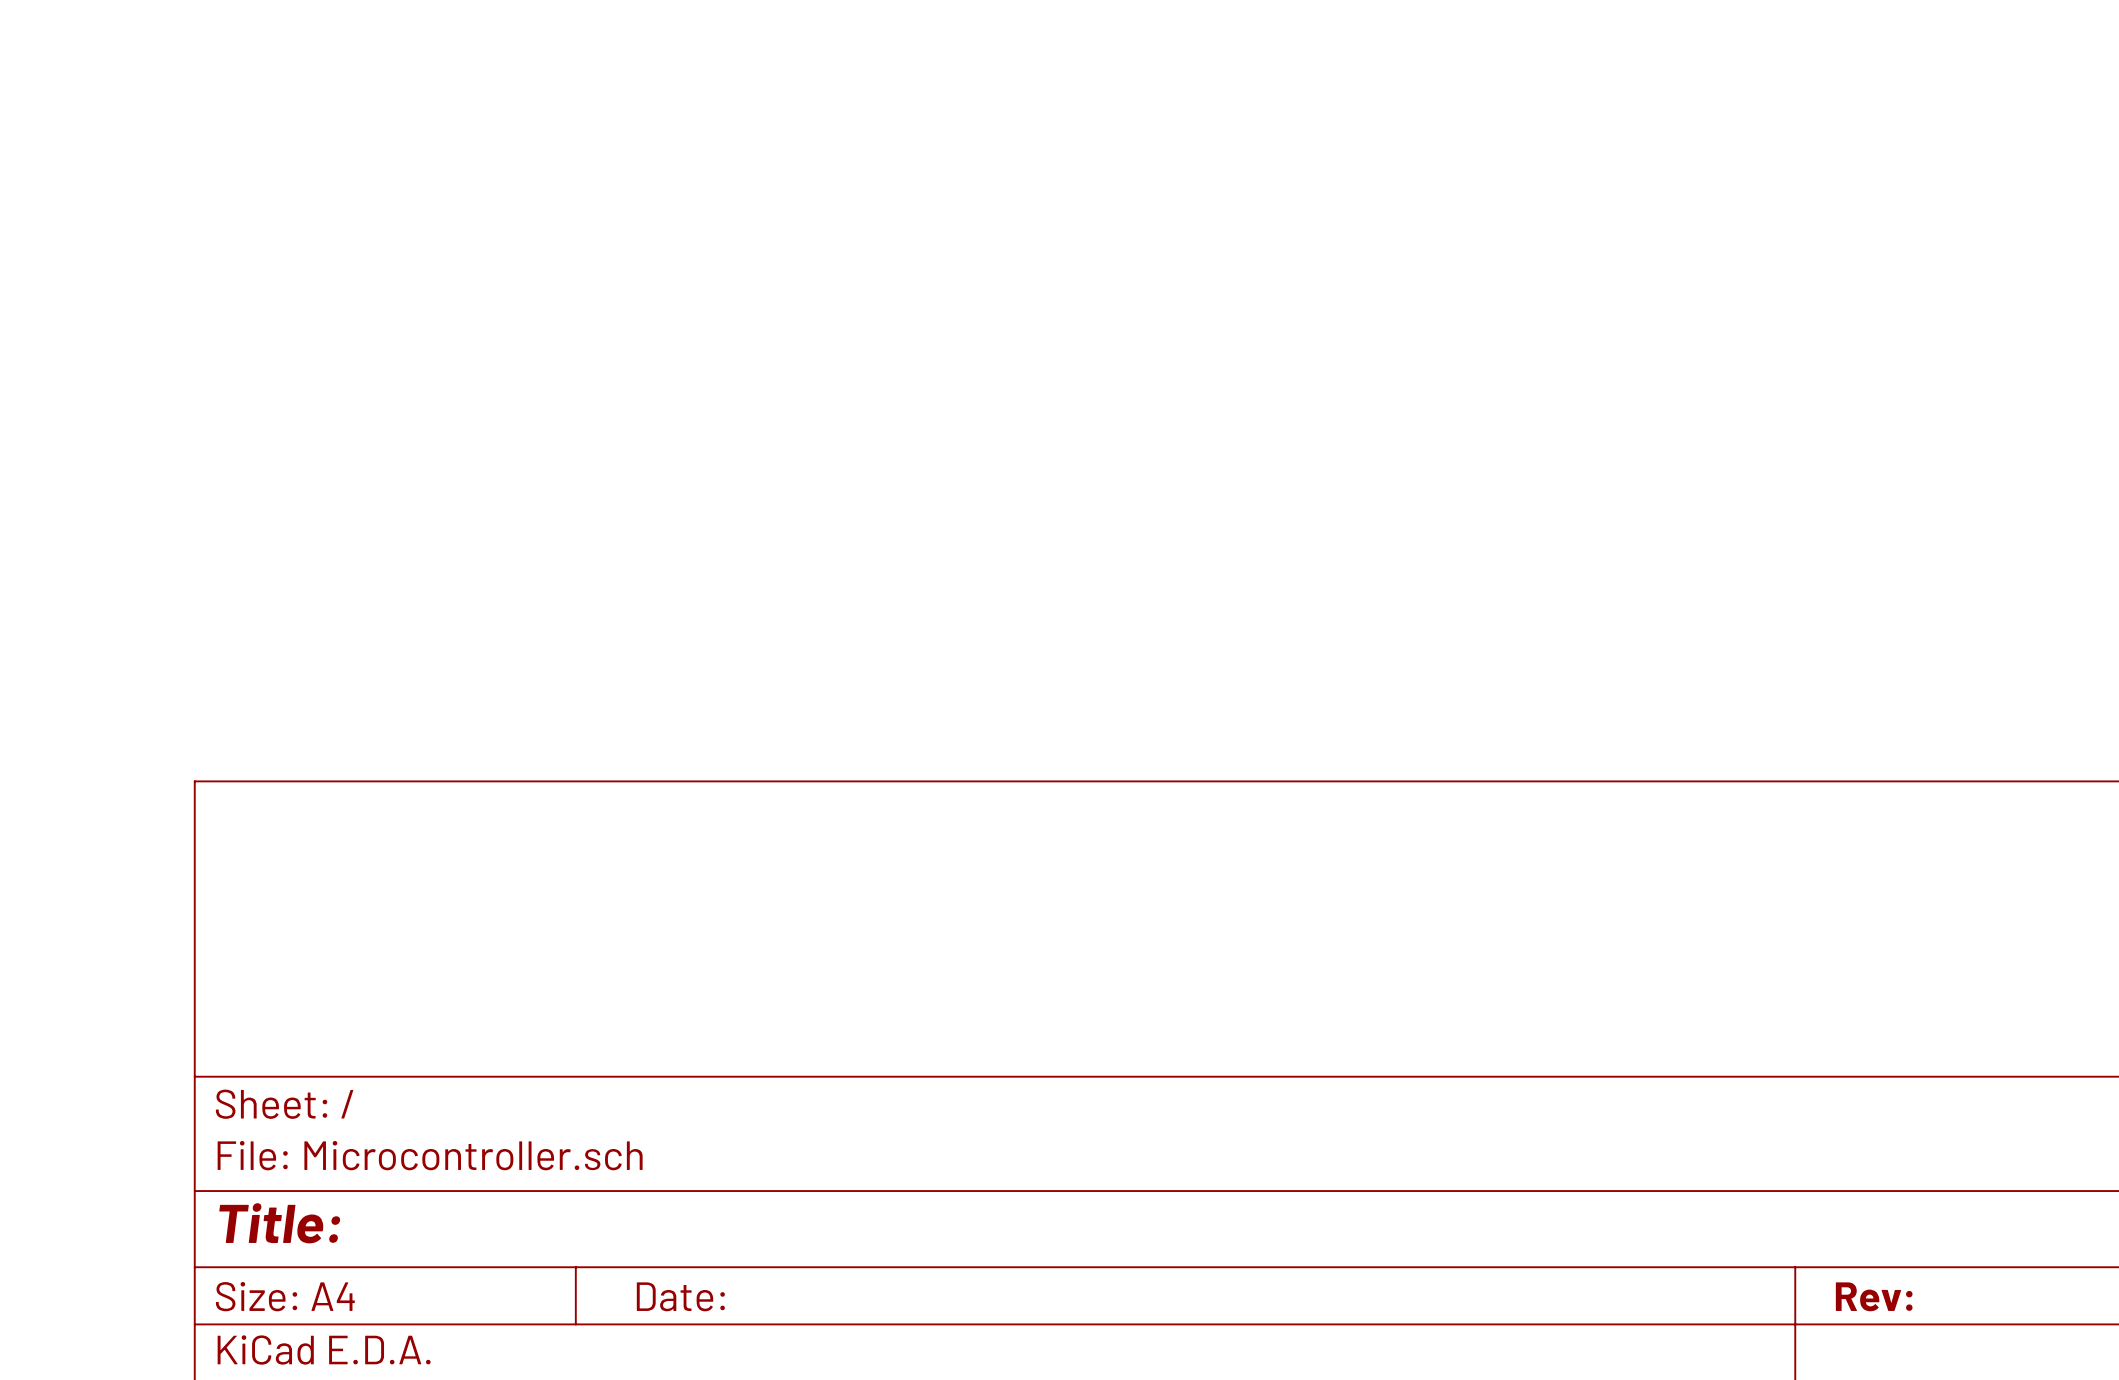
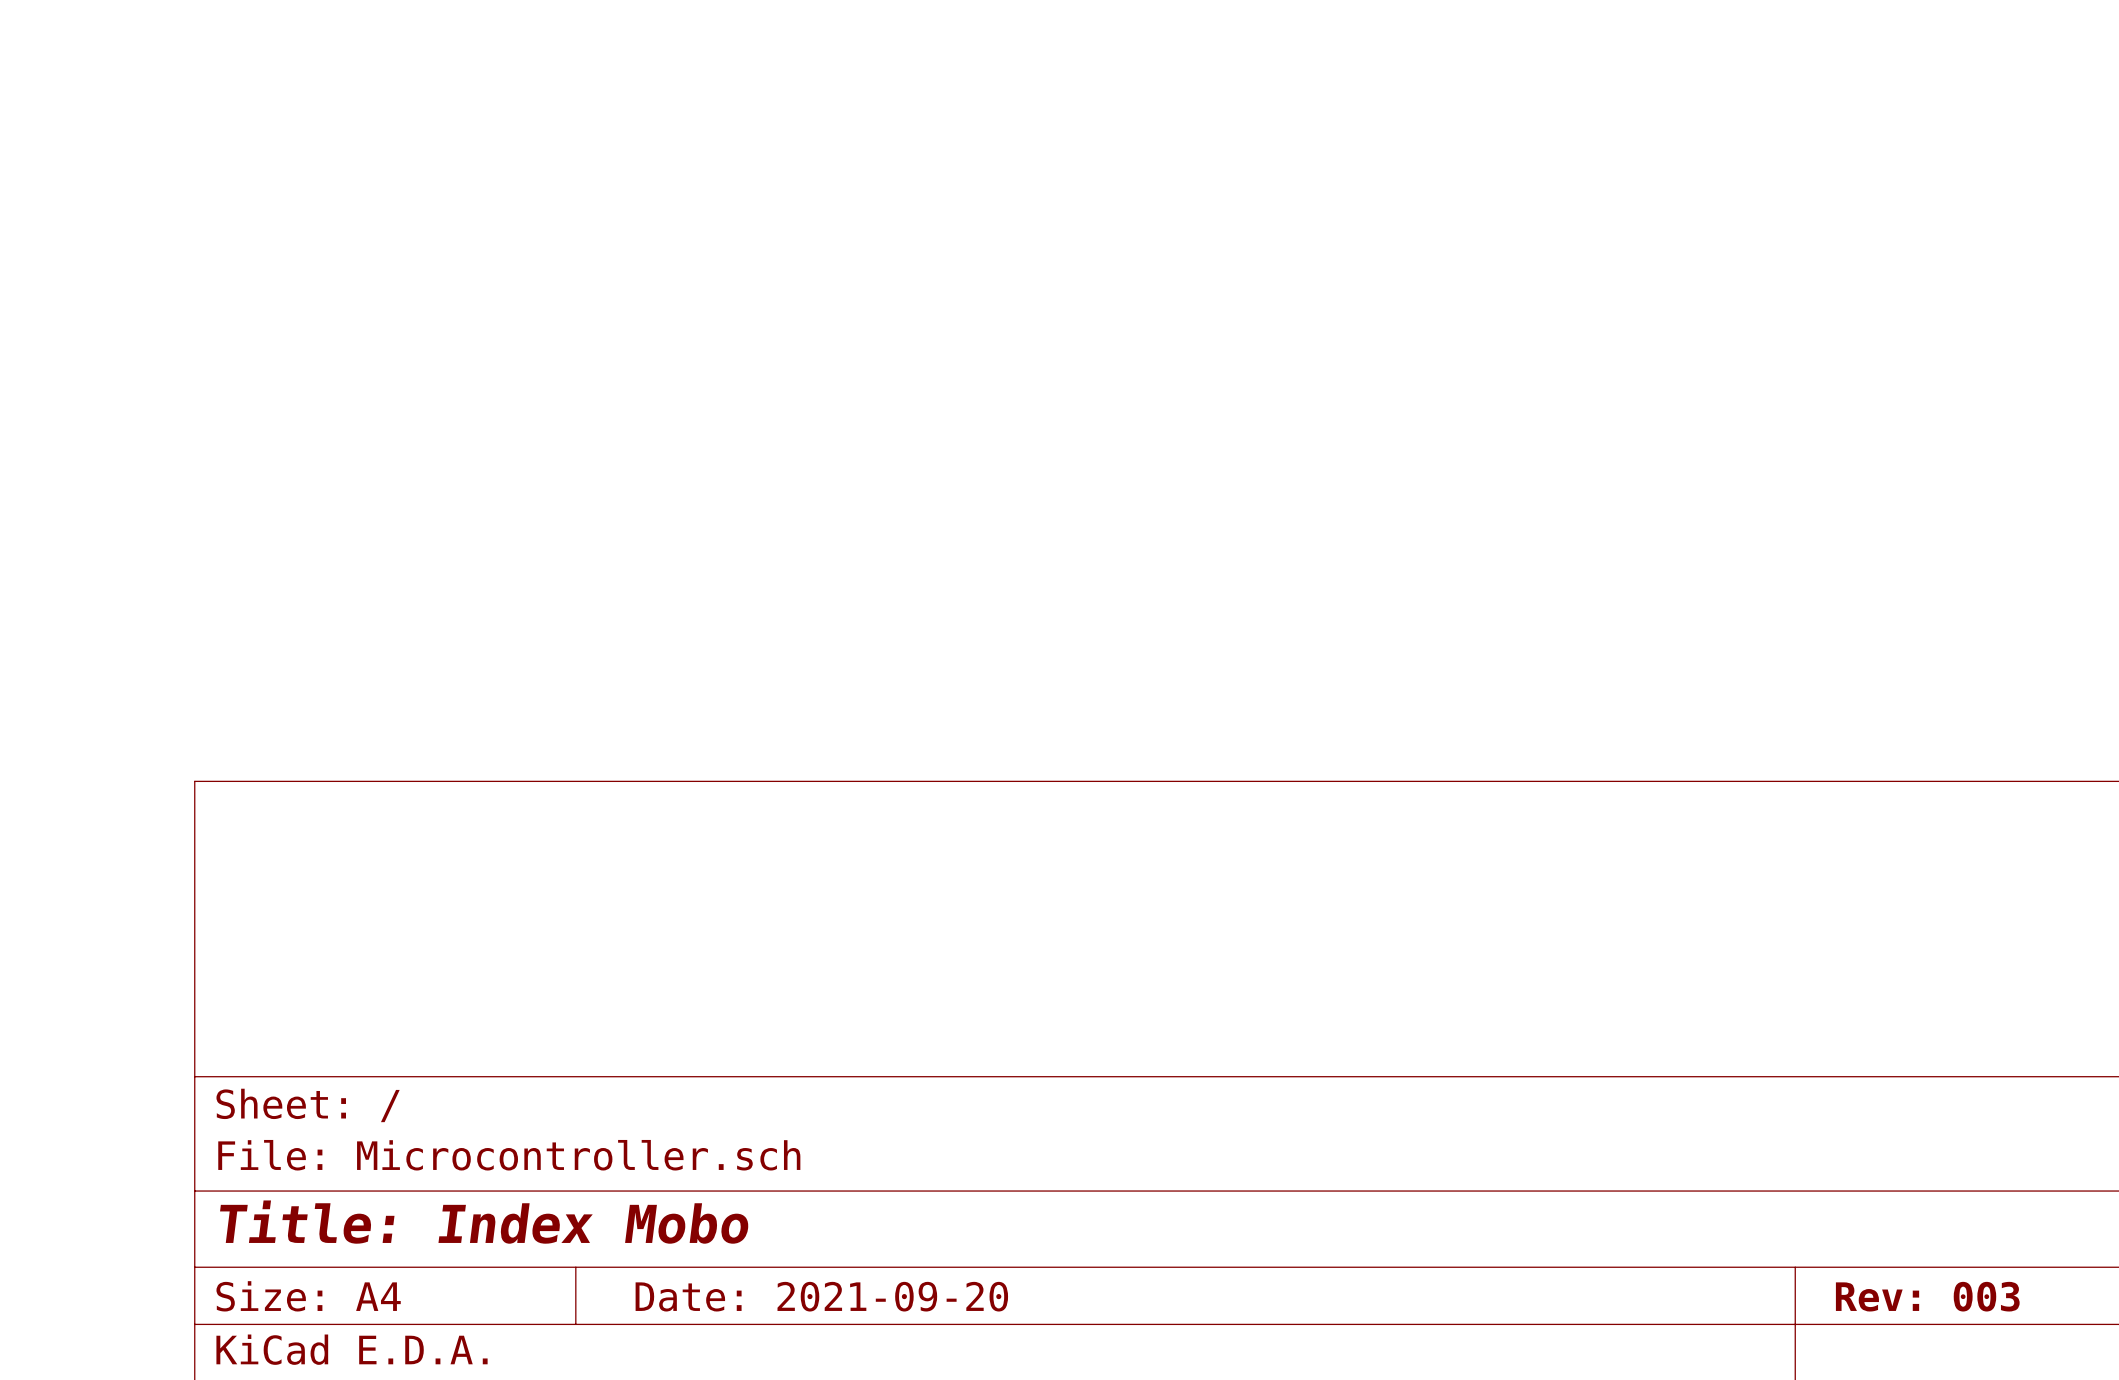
title block: Title: (279, 1223) -> Title: Index Mobo (484, 1222)
title block: Date: (680, 1296) -> Date: 2021-09-20 (821, 1296)
title block: Rev: (1874, 1296) -> Rev: 003 (1927, 1296)

